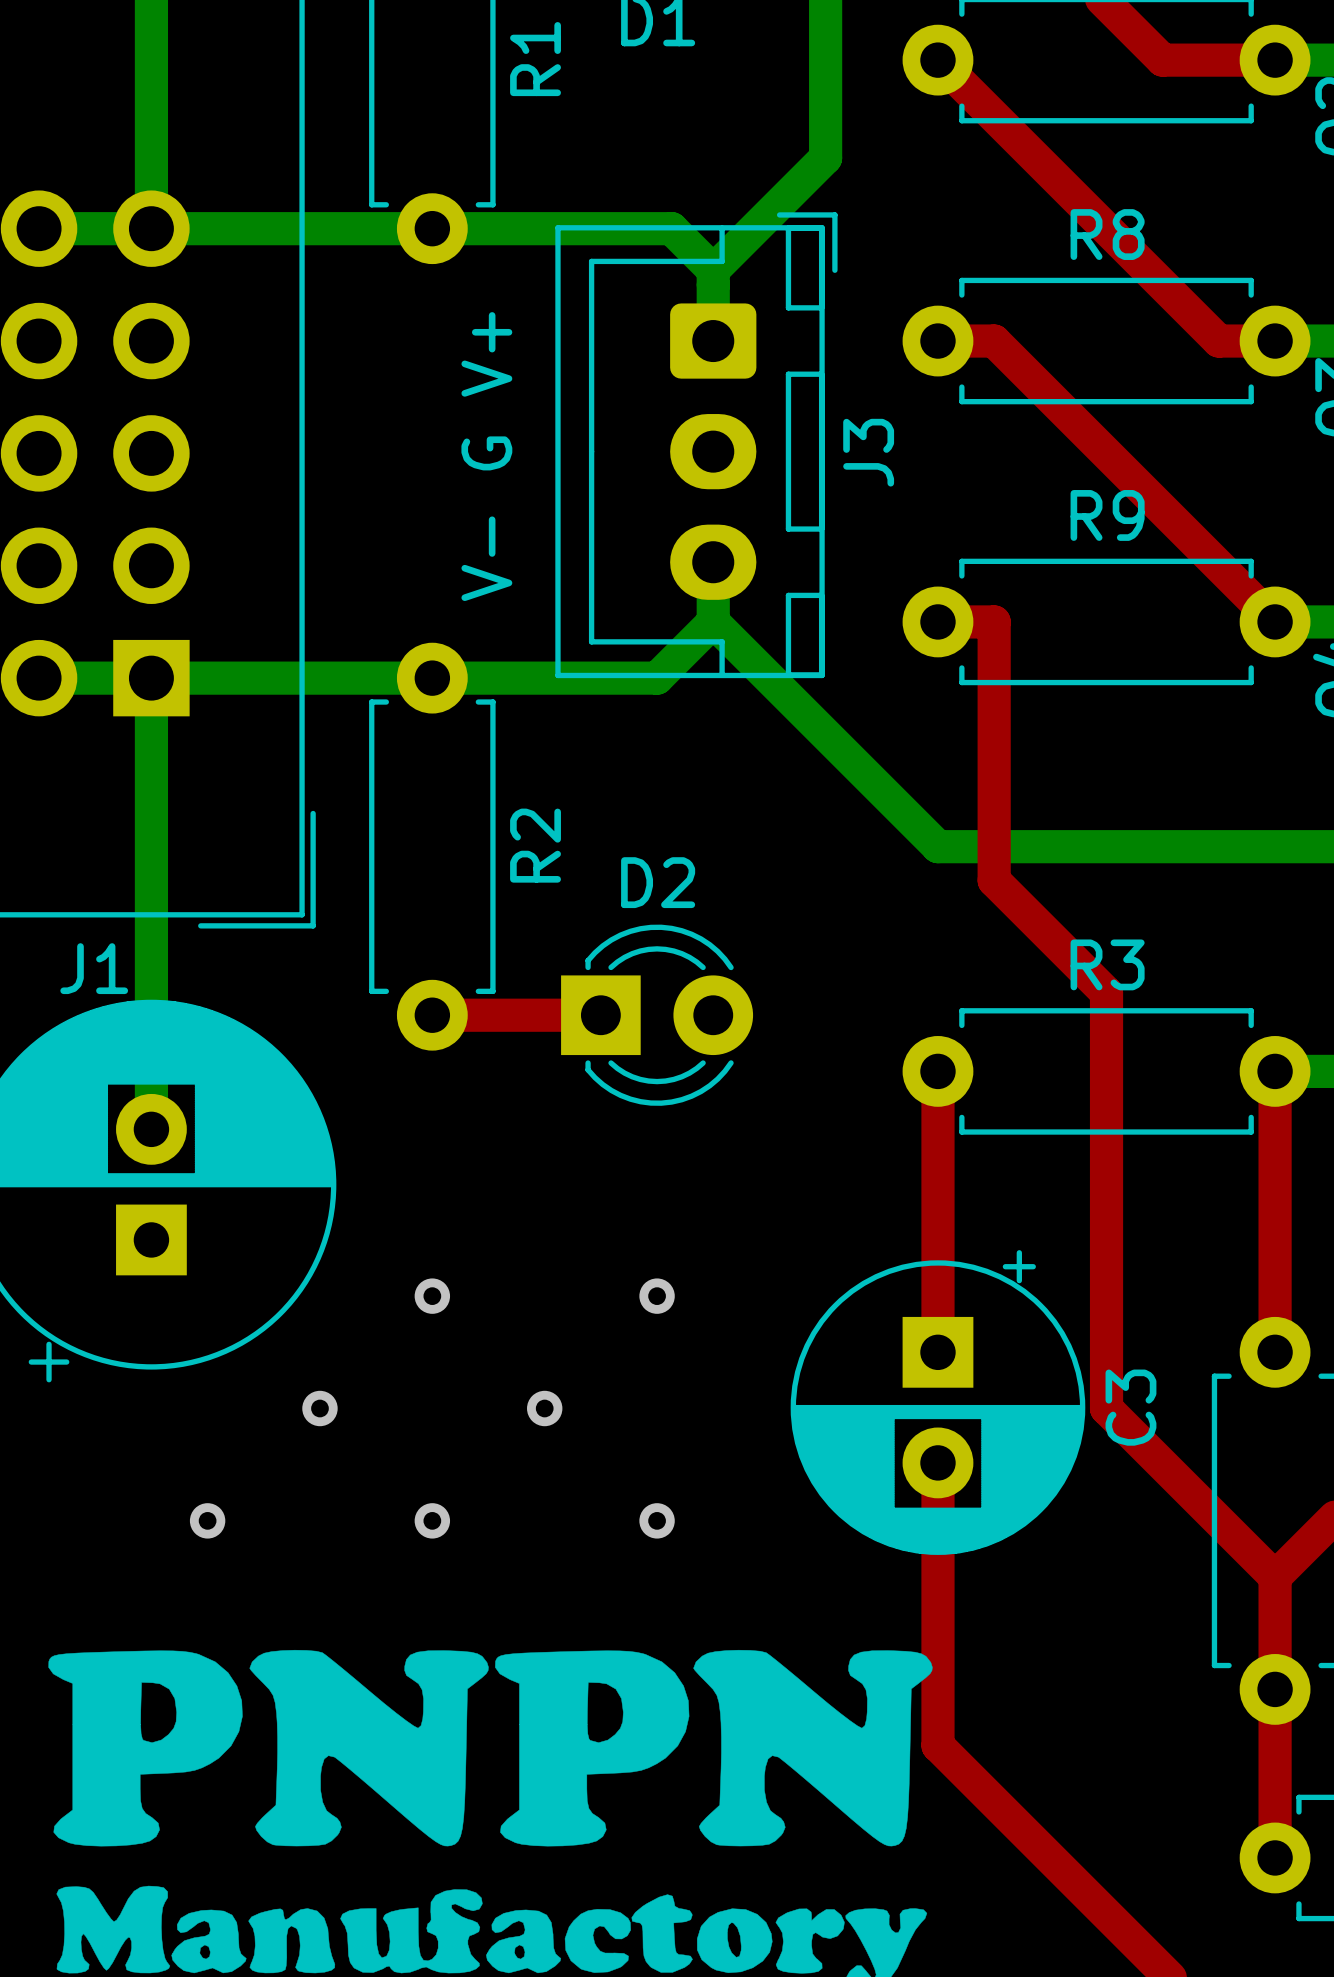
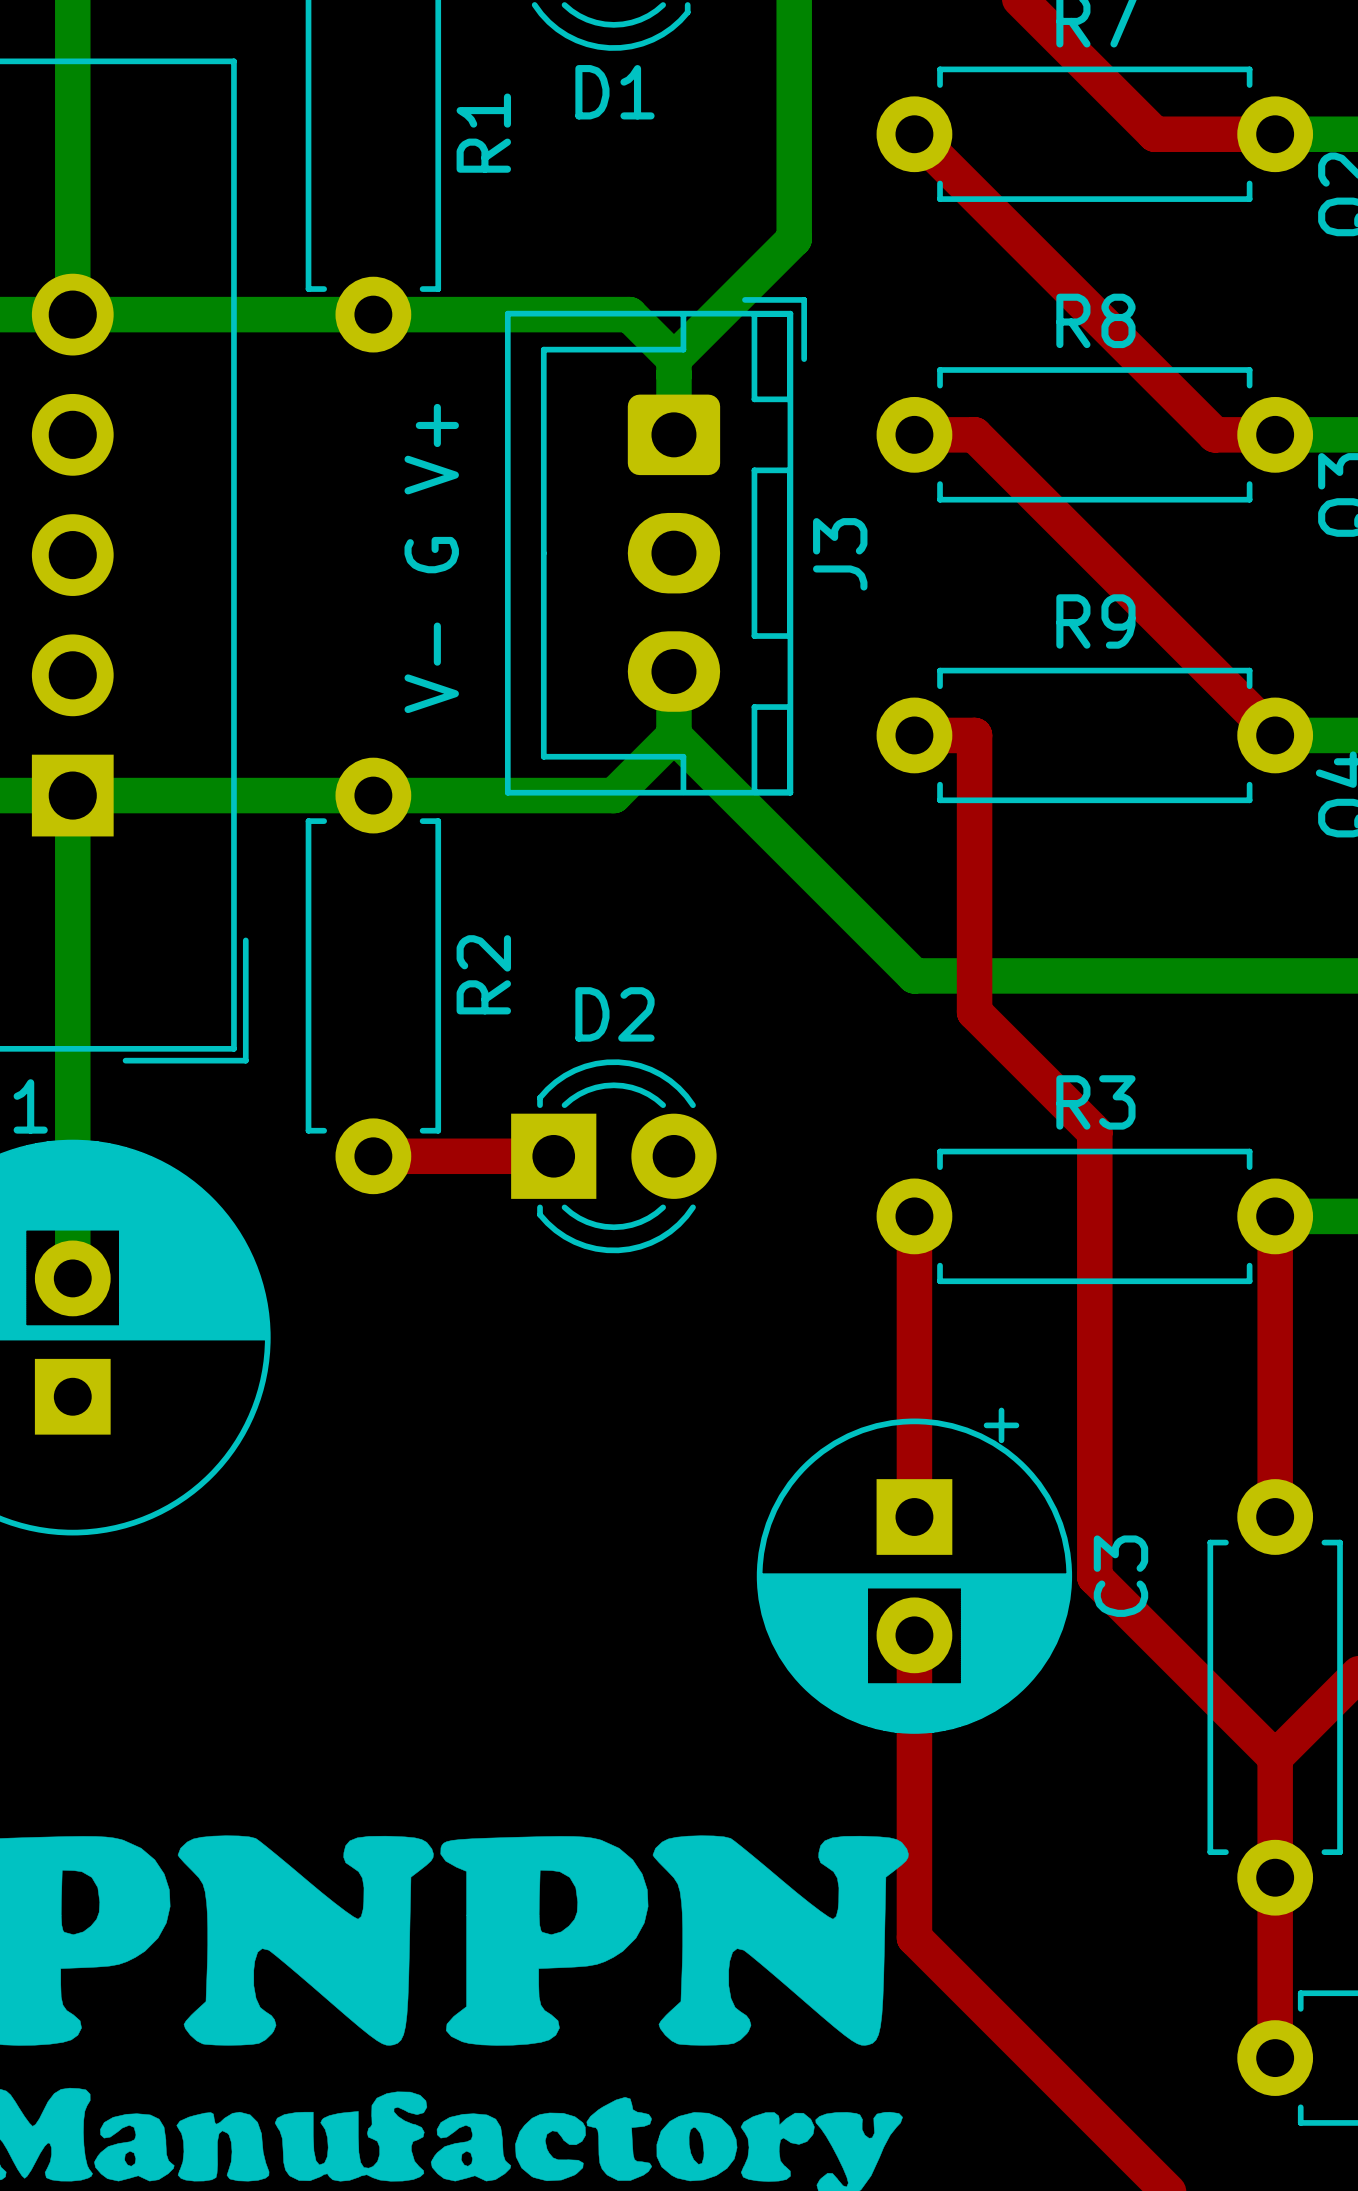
via: (432, 1296) -> none
via: (657, 1296) -> none
via: (319, 1408) -> none
via: (544, 1408) -> none
via: (207, 1520) -> none
via: (432, 1520) -> none
via: (657, 1520) -> none

